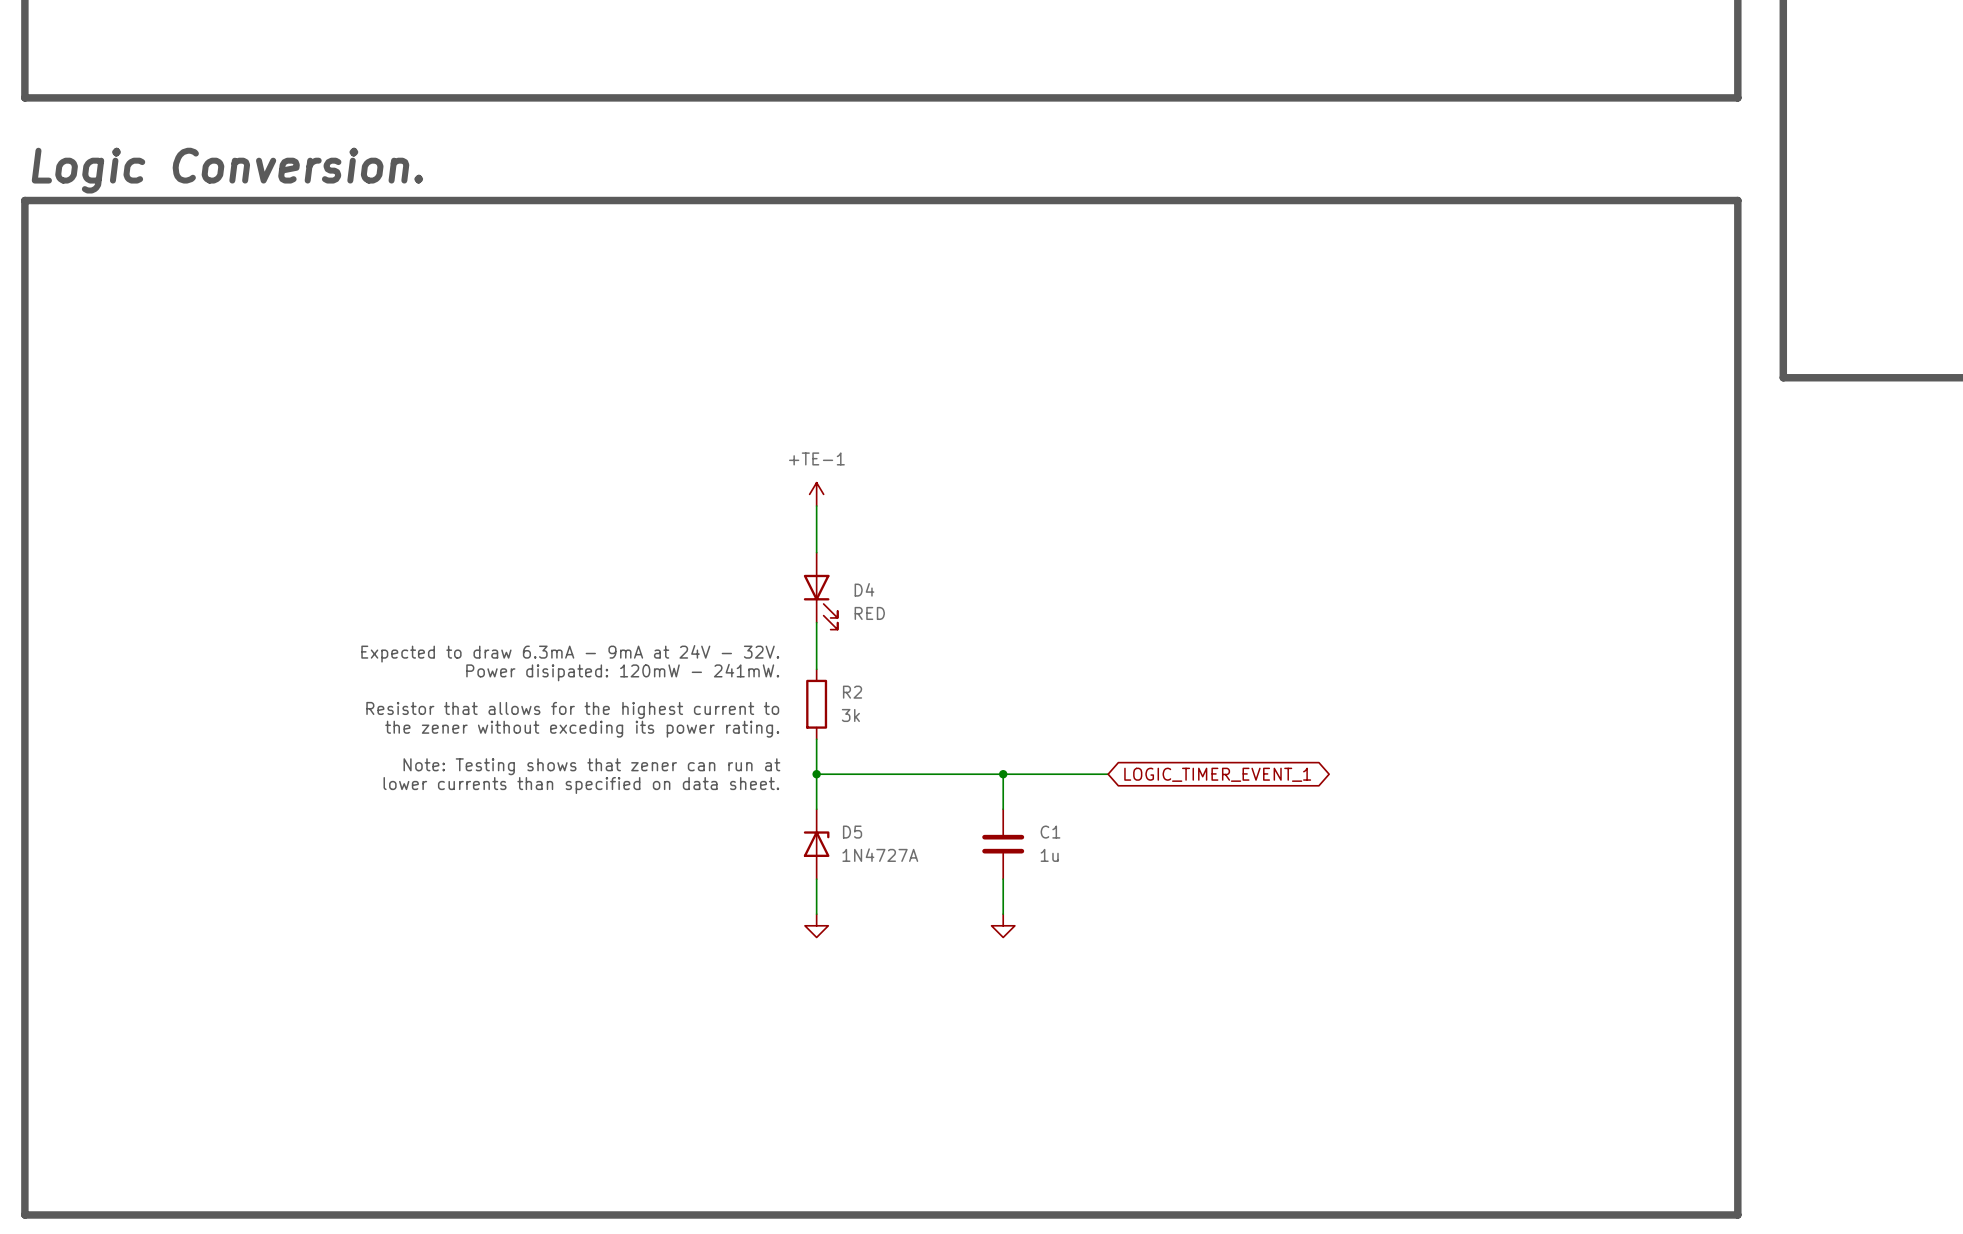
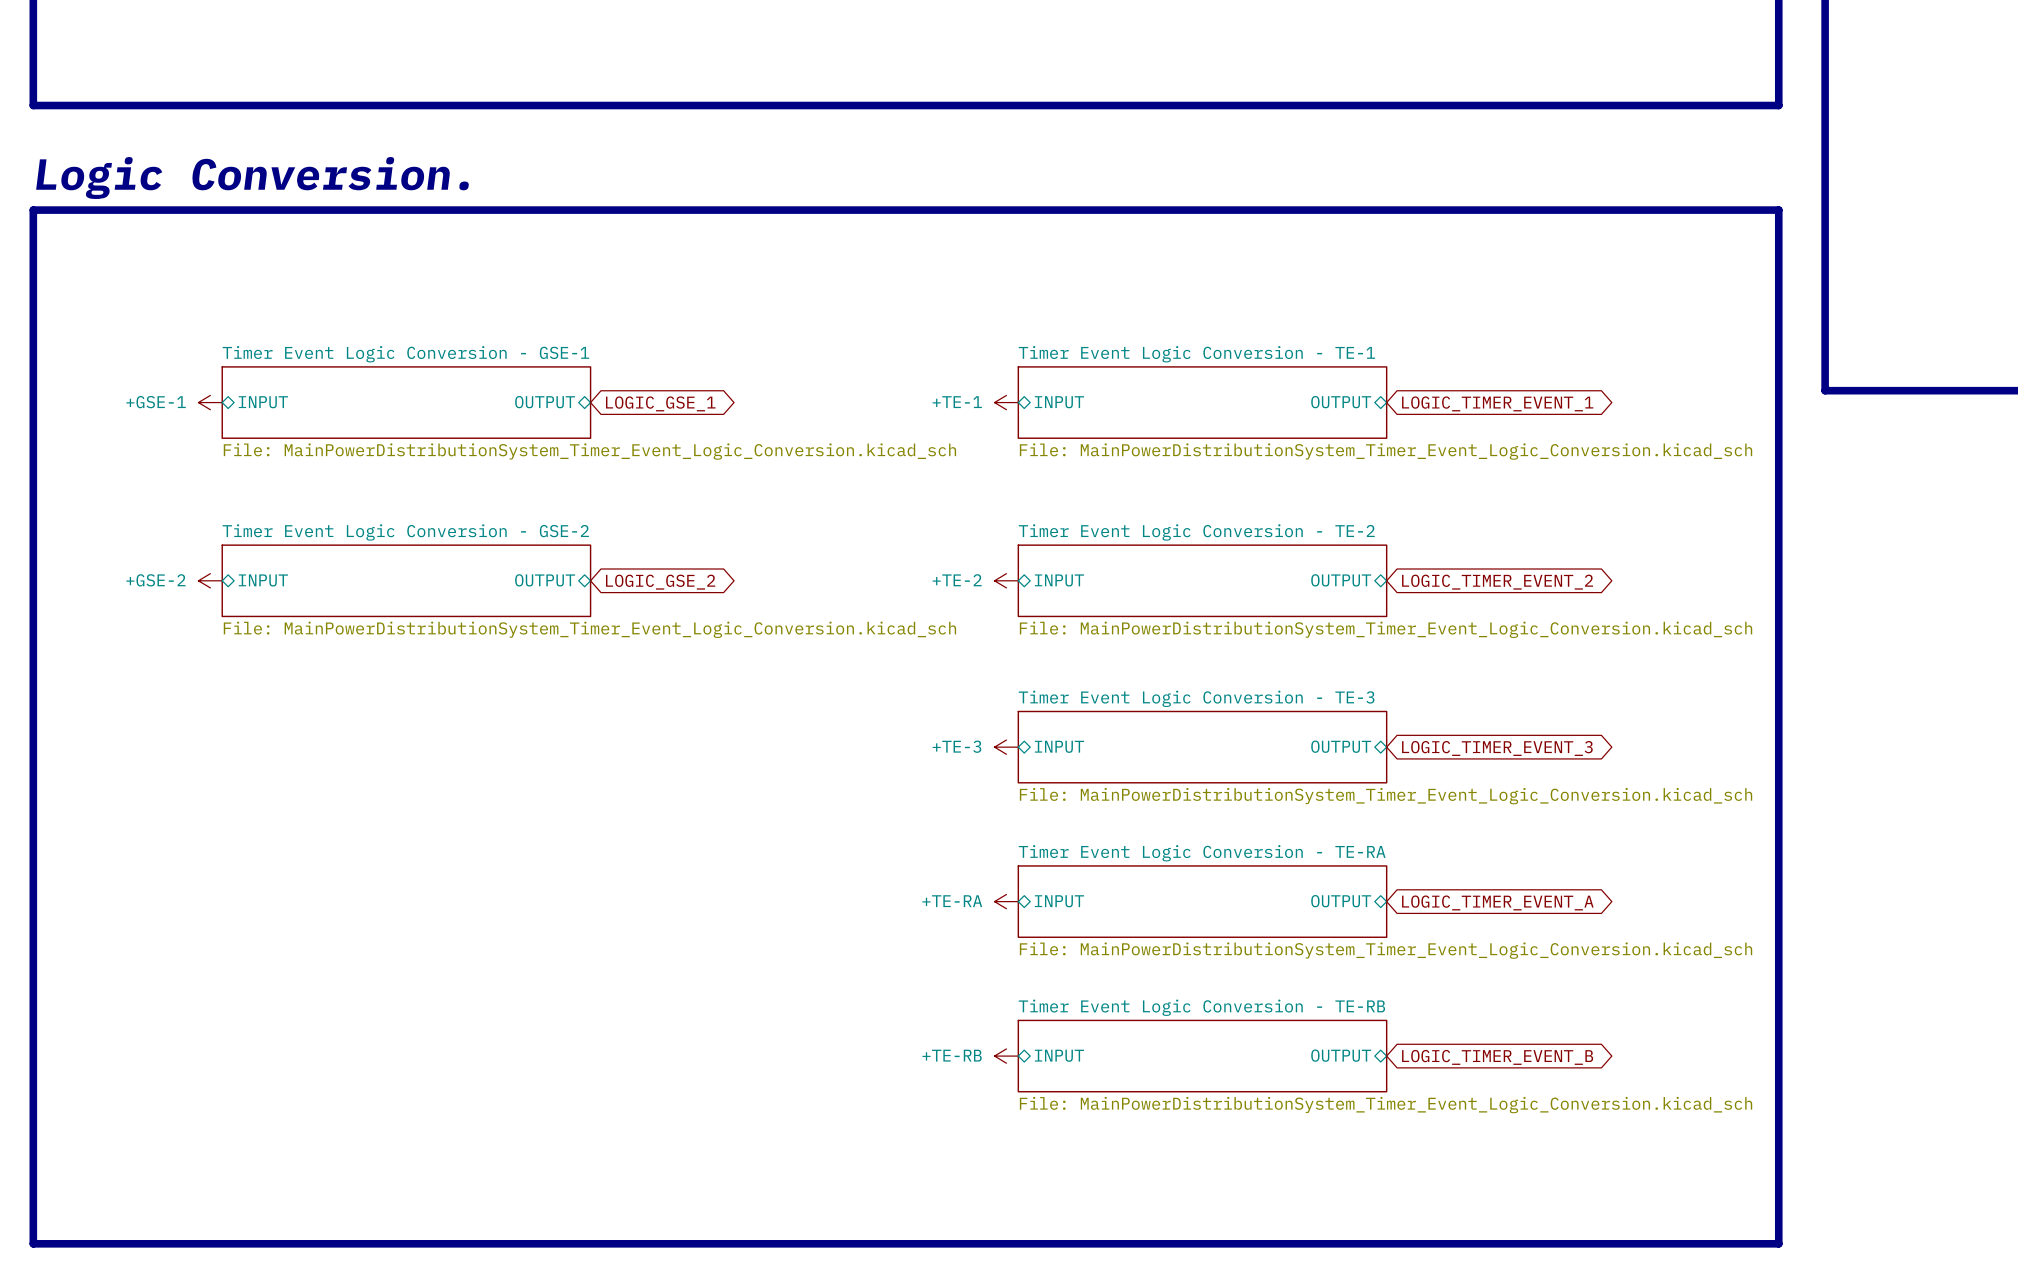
sheet pin: none -> INPUT (263, 402)
sheet pin: none -> OUTPUT (545, 402)
sheet pin: none -> INPUT (1059, 402)
sheet pin: none -> OUTPUT (1341, 402)
power symbol: none -> +GSE-1 (210, 402)
sheet Timer Event Logic Conversion - GSE-1: none -> File: MainPowerDistributionSystem_Timer_Event_Logic_Conversion.kicad_sch (406, 402)
global label: none -> LOGIC_GSE_1 (660, 403)
sheet Timer Event Logic Conversion - TE-1: none -> File: MainPowerDistributionSystem_Timer_Event_Logic_Conversion.kicad_sch (1202, 402)
global label: none -> LOGIC_TIMER_EVENT_1 (1497, 403)
power symbol text position: +TE-1 (816, 458) -> +TE-1 (957, 402)
power symbol rotation: 0° (816, 494) -> 90° counterclockwise (1006, 402)
power symbol position: +TE-1 (816, 494) -> +TE-1 (1006, 402)
wire: (816, 506) (816, 552) -> none
sheet pin: none -> INPUT (263, 580)
sheet pin: none -> OUTPUT (545, 580)
sheet pin: none -> INPUT (1059, 580)
sheet pin: none -> OUTPUT (1341, 580)
power symbol: none -> +GSE-2 (210, 580)
sheet Timer Event Logic Conversion - GSE-2: none -> File: MainPowerDistributionSystem_Timer_Event_Logic_Conversion.kicad_sch (406, 580)
global label: none -> LOGIC_GSE_2 (660, 582)
power symbol: none -> +TE-2 (1006, 580)
sheet Timer Event Logic Conversion - TE-2: none -> File: MainPowerDistributionSystem_Timer_Event_Logic_Conversion.kicad_sch (1202, 580)
global label: none -> LOGIC_TIMER_EVENT_2 (1497, 582)
D4: RED (820, 591) -> none
wire: (816, 622) (816, 669) -> none
text: Expected to draw 6.3mA - 9mA at 24V - 32V. (570, 653) -> none
text: Power disipated: 120mW - 241mW. (622, 672) -> none
R2: 3k (816, 704) -> none
text: Resistor that allows for the highest current to (572, 710) -> none
power symbol: none -> +TE-3 (1006, 747)
sheet pin: none -> INPUT (1059, 746)
sheet Timer Event Logic Conversion - TE-3: none -> File: MainPowerDistributionSystem_Timer_Event_Logic_Conversion.kicad_sch (1202, 747)
sheet pin: none -> OUTPUT (1341, 746)
global label: none -> LOGIC_TIMER_EVENT_3 (1497, 748)
text: the zener without exceding its power rating. (582, 729) -> none
wire: (816, 739) (816, 809) -> none
text: Note: Testing shows that zener can run at (591, 766) -> none
wire: (816, 774) (1108, 774) -> none
junction: (816, 774) -> none
wire: (1003, 774) (1003, 809) -> none
junction: (1003, 774) -> none
global label: LOGIC_TIMER_EVENT_1 (1217, 774) -> none
text: lower currents than specified on data sheet. (581, 785) -> none
D5: 1N4727A (816, 844) -> none
C1: 1u (1003, 844) -> none
sheet pin: none -> INPUT (1059, 901)
sheet pin: none -> OUTPUT (1341, 901)
wire: (816, 879) (816, 914) -> none
power symbol: none -> +TE-RA (1006, 901)
wire: (1003, 879) (1003, 914) -> none
sheet Timer Event Logic Conversion - TE-RA: none -> File: MainPowerDistributionSystem_Timer_Event_Logic_Conversion.kicad_sch (1202, 901)
global label: none -> LOGIC_TIMER_EVENT_A (1497, 902)
power symbol: (816, 925) -> none
power symbol: (1003, 925) -> none
power symbol: none -> +TE-RB (1006, 1056)
sheet pin: none -> INPUT (1059, 1055)
sheet Timer Event Logic Conversion - TE-RB: none -> File: MainPowerDistributionSystem_Timer_Event_Logic_Conversion.kicad_sch (1202, 1056)
sheet pin: none -> OUTPUT (1341, 1055)
global label: none -> LOGIC_TIMER_EVENT_B (1497, 1057)

